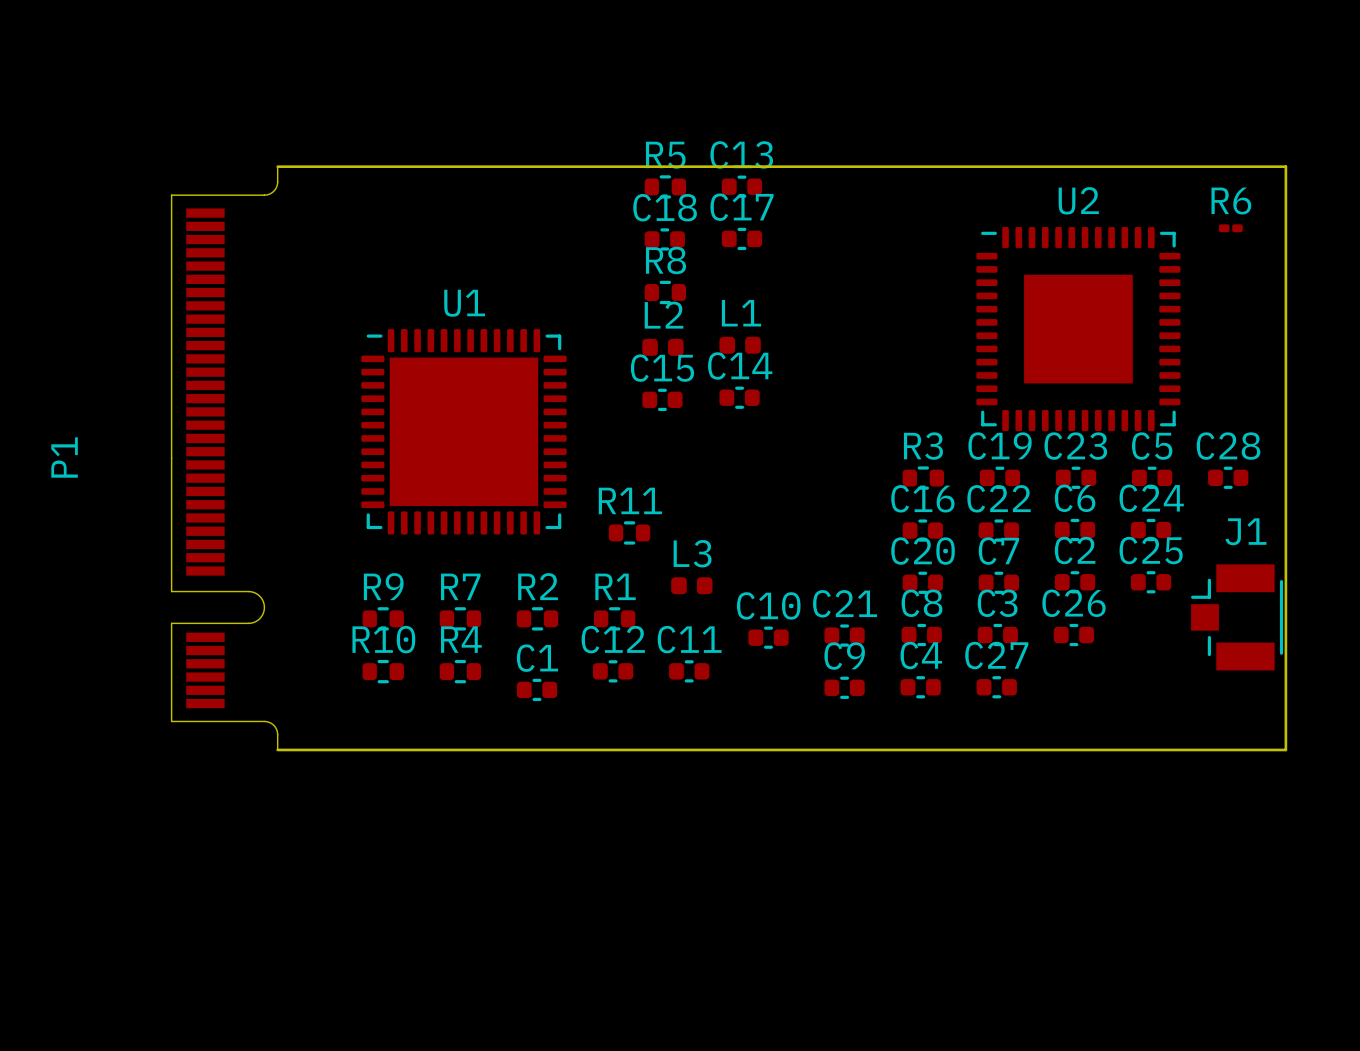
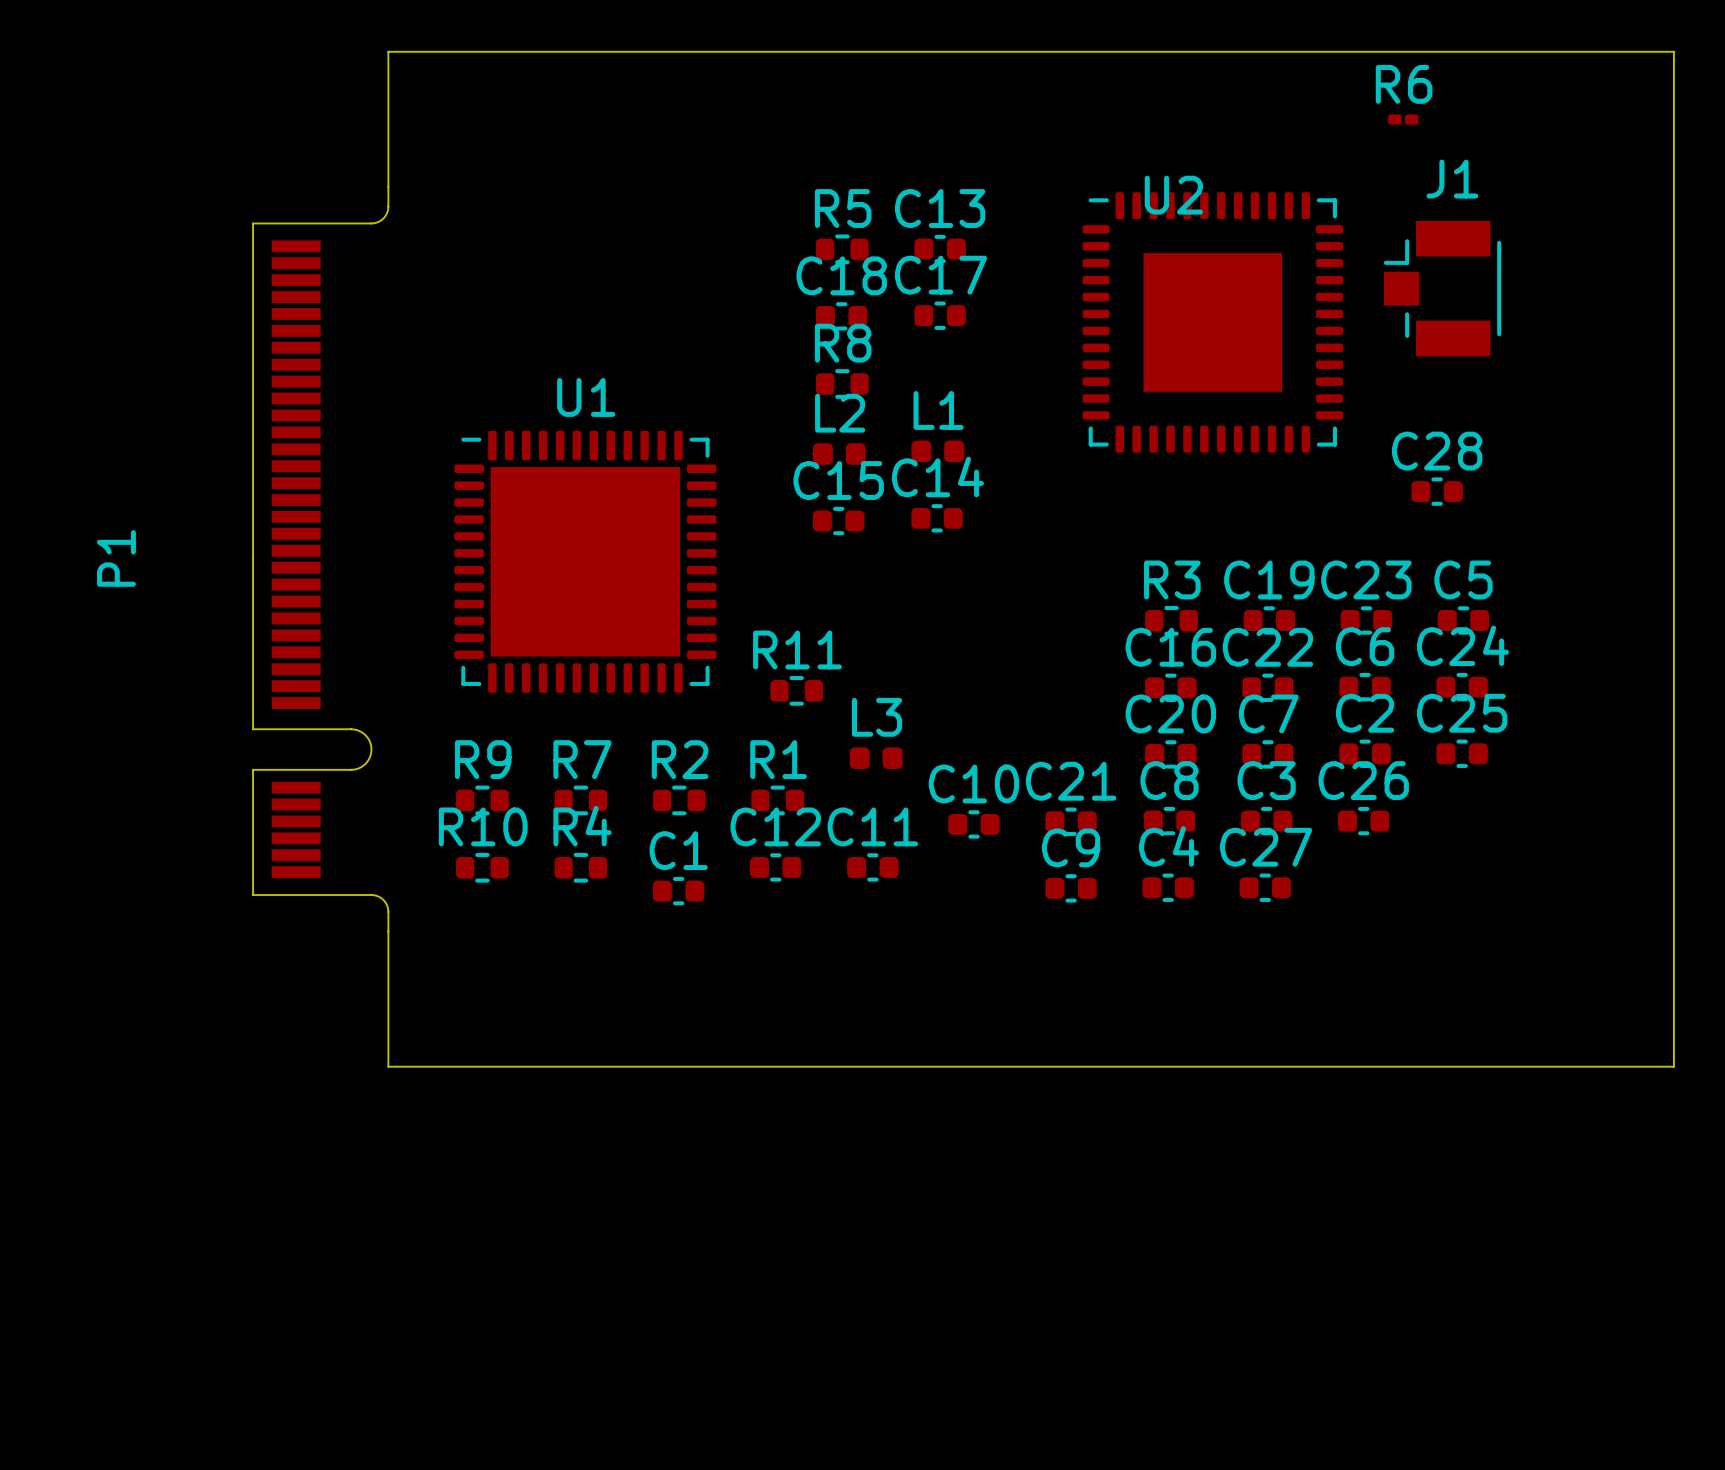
board edge: none -> (388, 187) (388, 51) (1673, 51) (1673, 1066) (388, 1066) (388, 931)
board edge: (277, 166) (1285, 166) (1285, 749) (277, 749) -> none
U2 name position: U2 (1078, 200) -> U2 (1173, 195)
R6 position: (1230, 228) -> (1403, 119)
U2 position: (1078, 329) -> (1212, 322)
P1 position: (224, 458) -> (320, 559)
C28 position: (1228, 477) -> (1437, 491)
J1 position: (1237, 617) -> (1442, 288)

